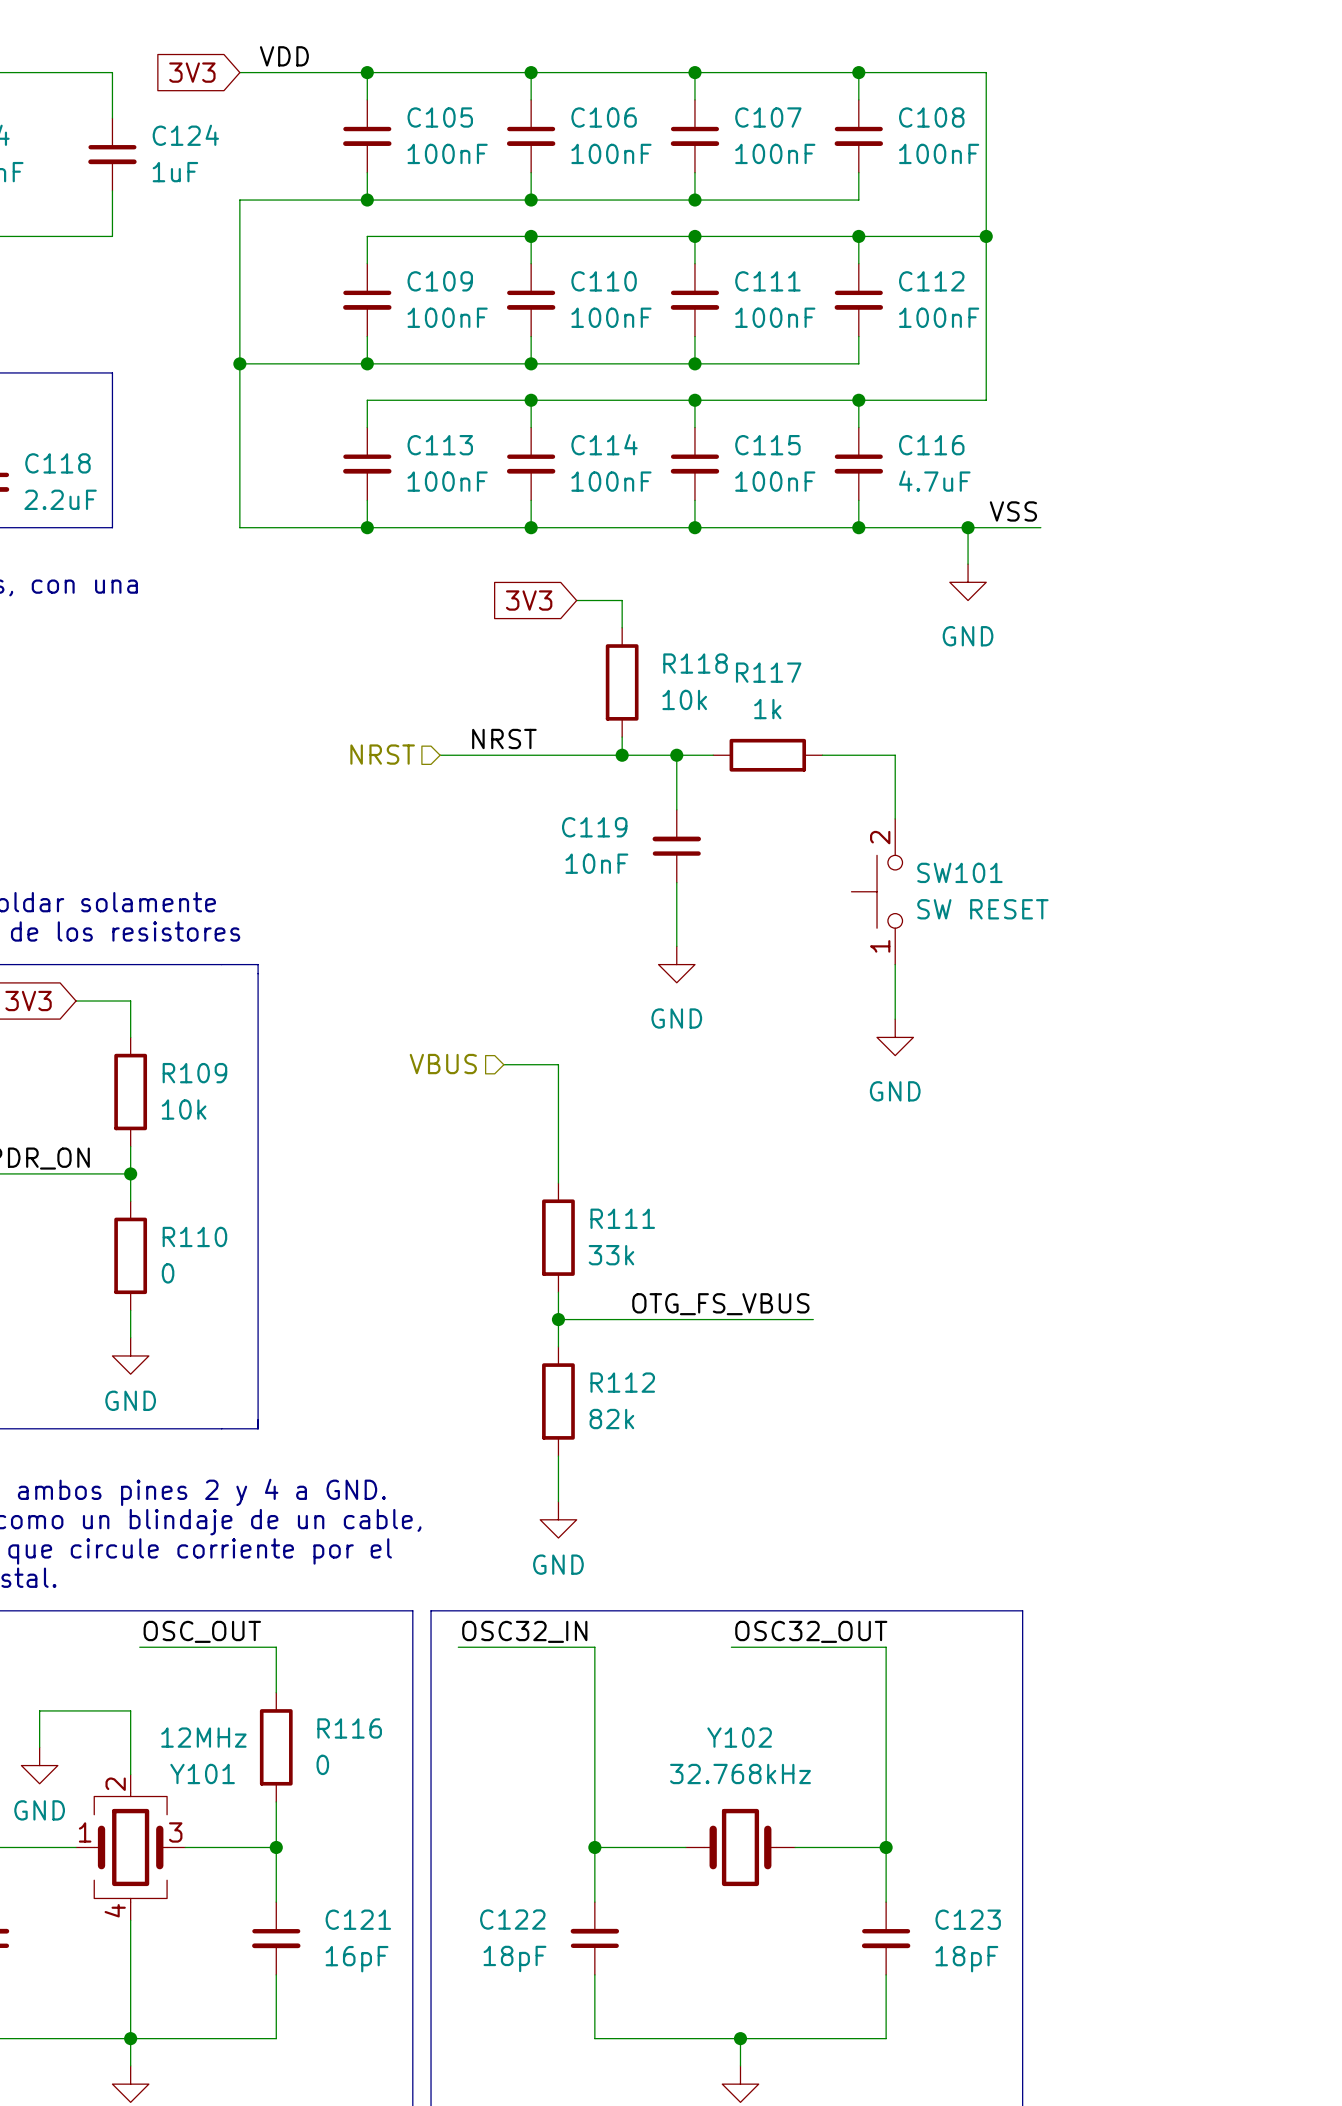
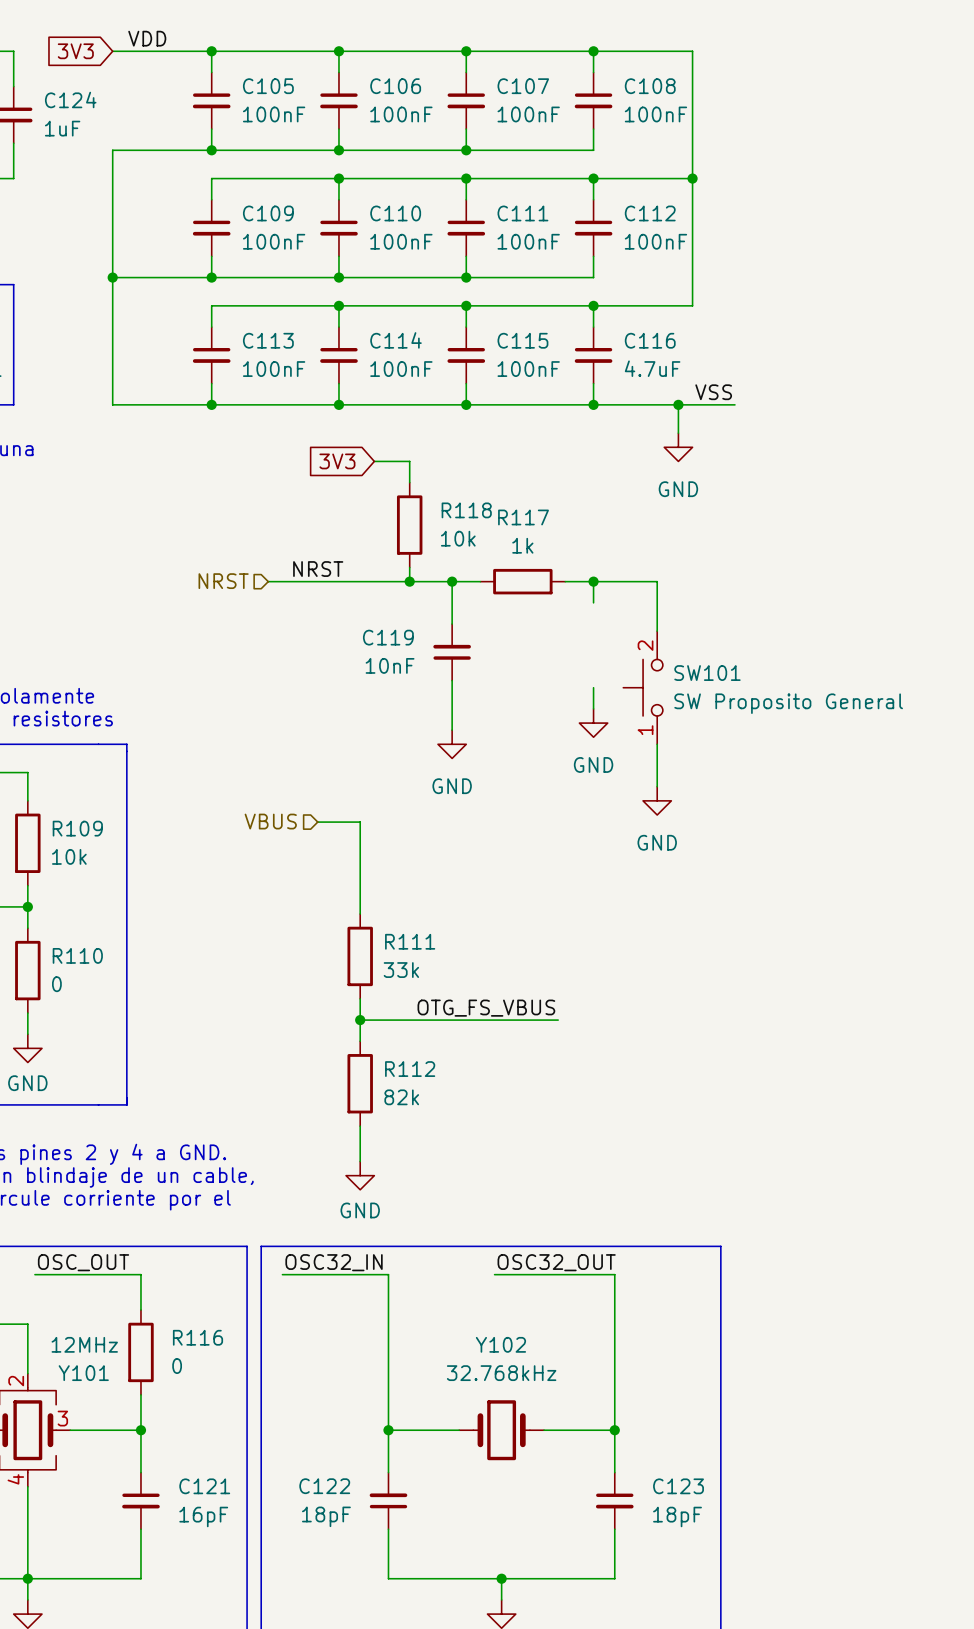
wire: none -> (593, 581) (593, 602)
junction: none -> (593, 581)
wire: (895, 755) (895, 818) -> (621, 581) (657, 581) (657, 631)
wire: none -> (593, 687) (593, 708)
SW101 position: (877, 891) -> (643, 687)
SW101 value: SW RESET (982, 909) -> SW Proposito General (788, 703)
power symbol: none -> GND (593, 723)
wire: (895, 964) (895, 1019) -> (657, 744) (657, 786)
power symbol position: GND (895, 1037) -> GND (657, 800)

